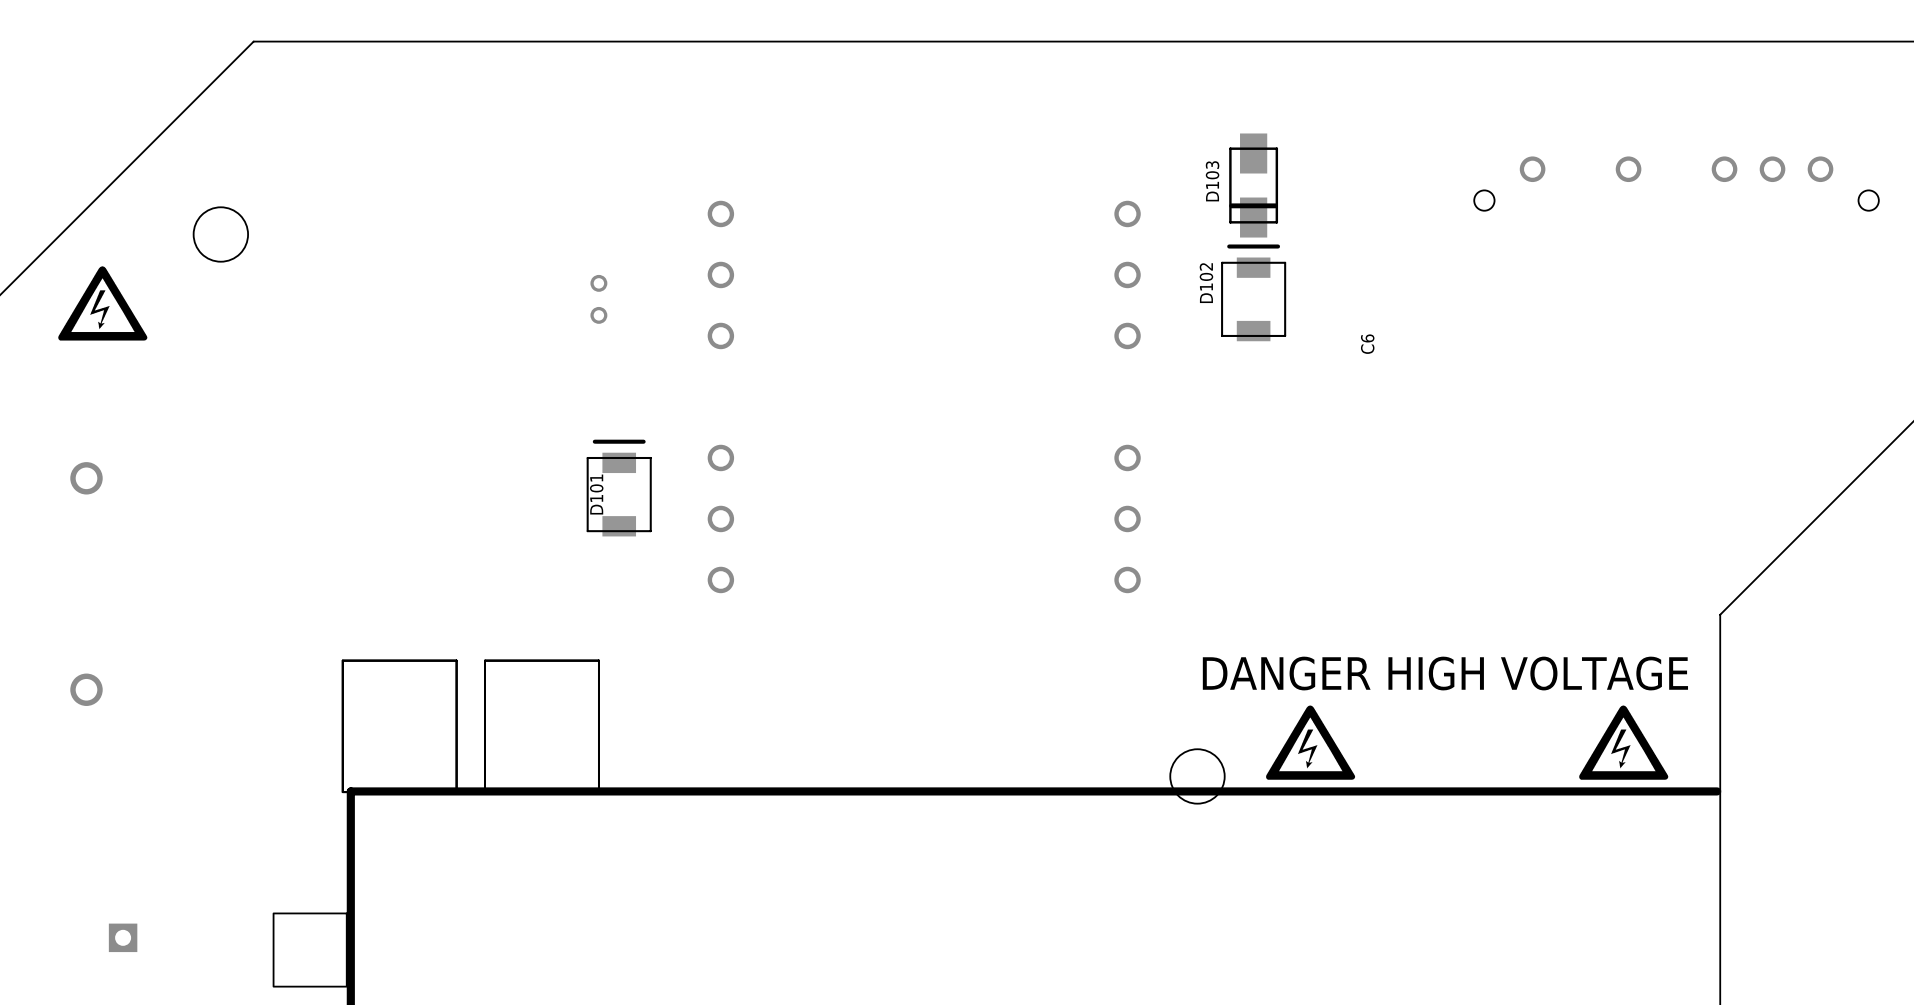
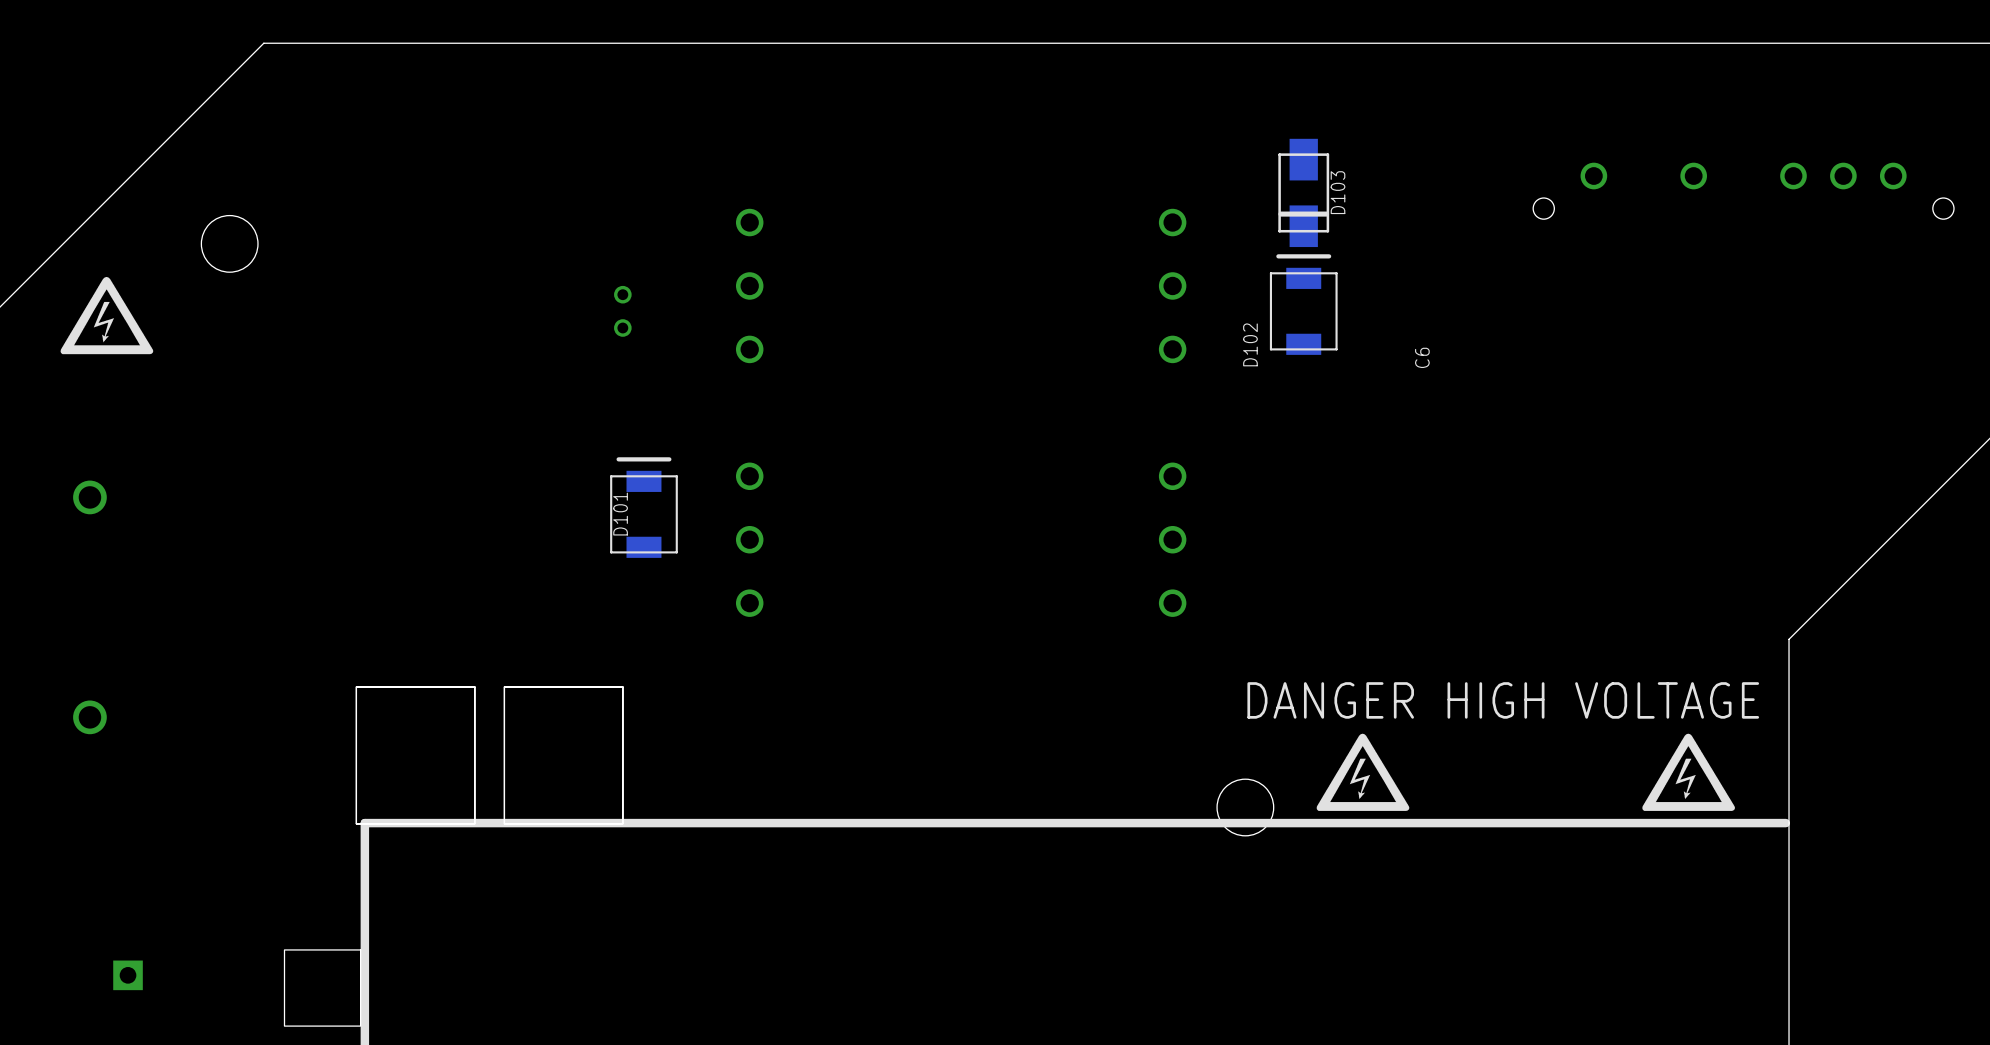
D103 name position: D103 (1212, 181) -> D103 (1338, 192)
D102 name position: D102 (1206, 283) -> D102 (1250, 344)

